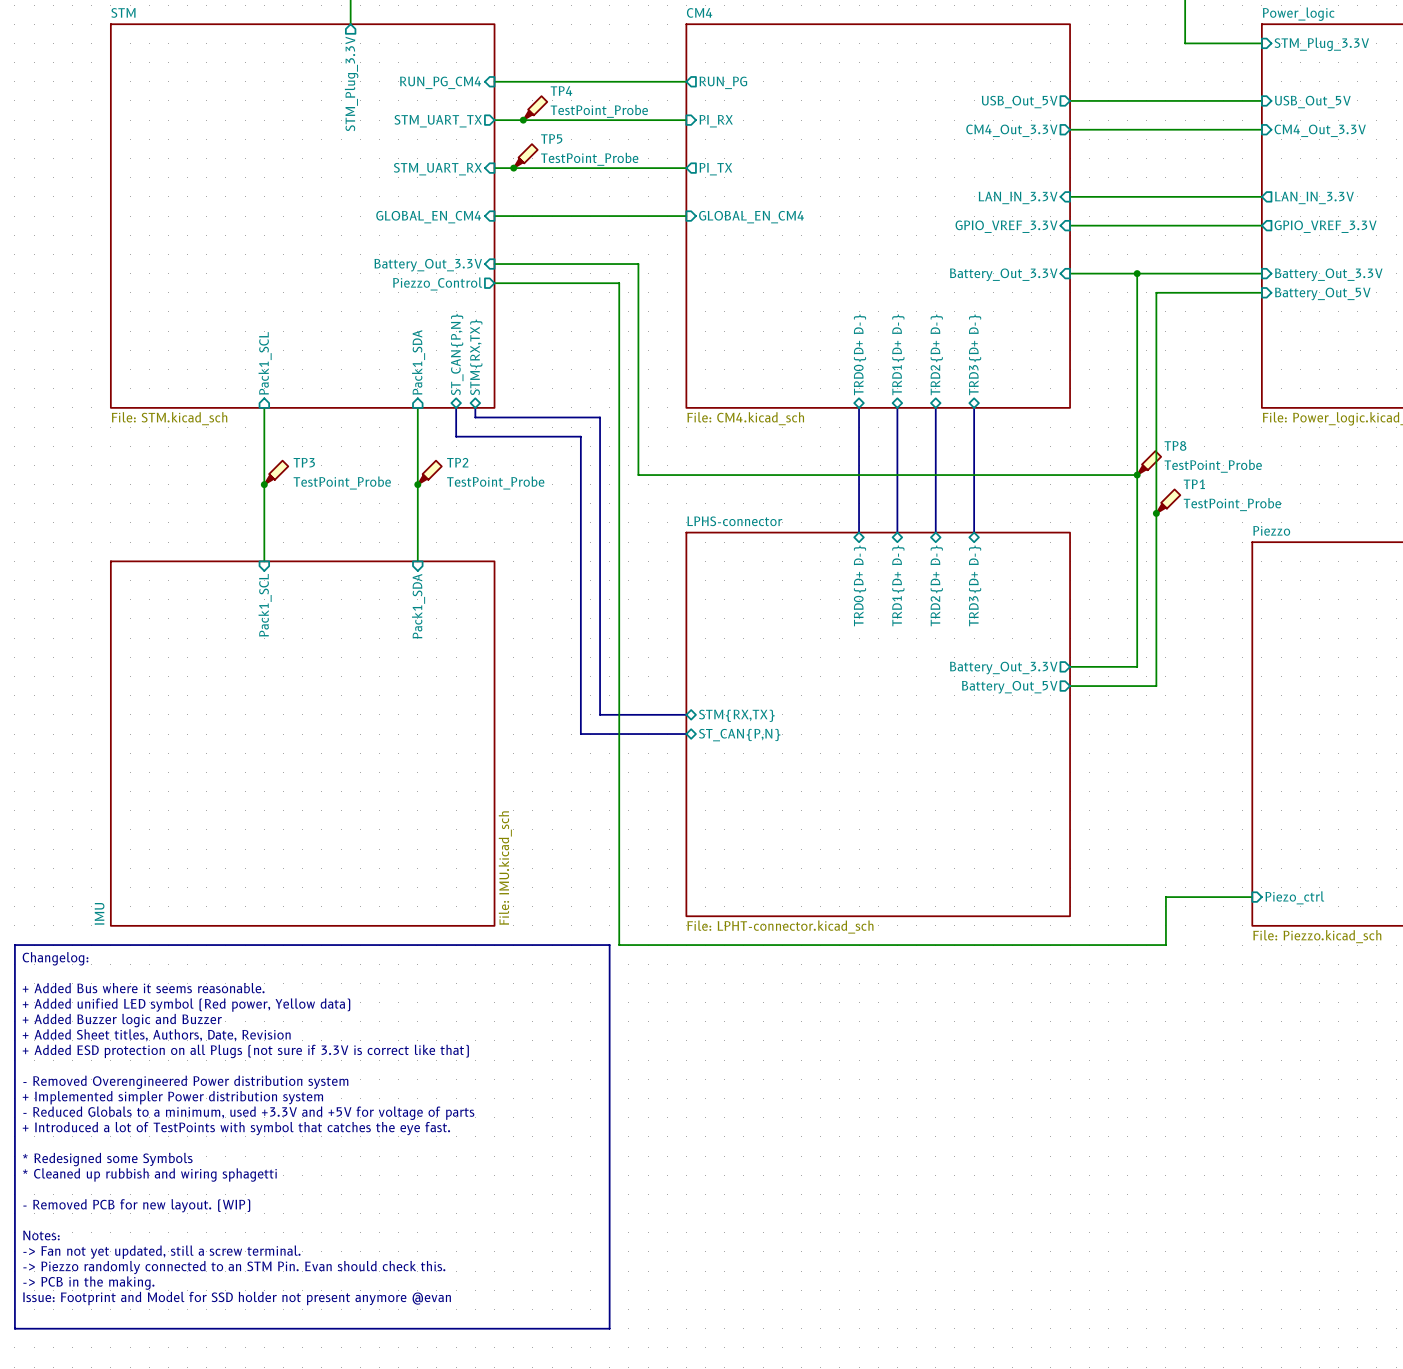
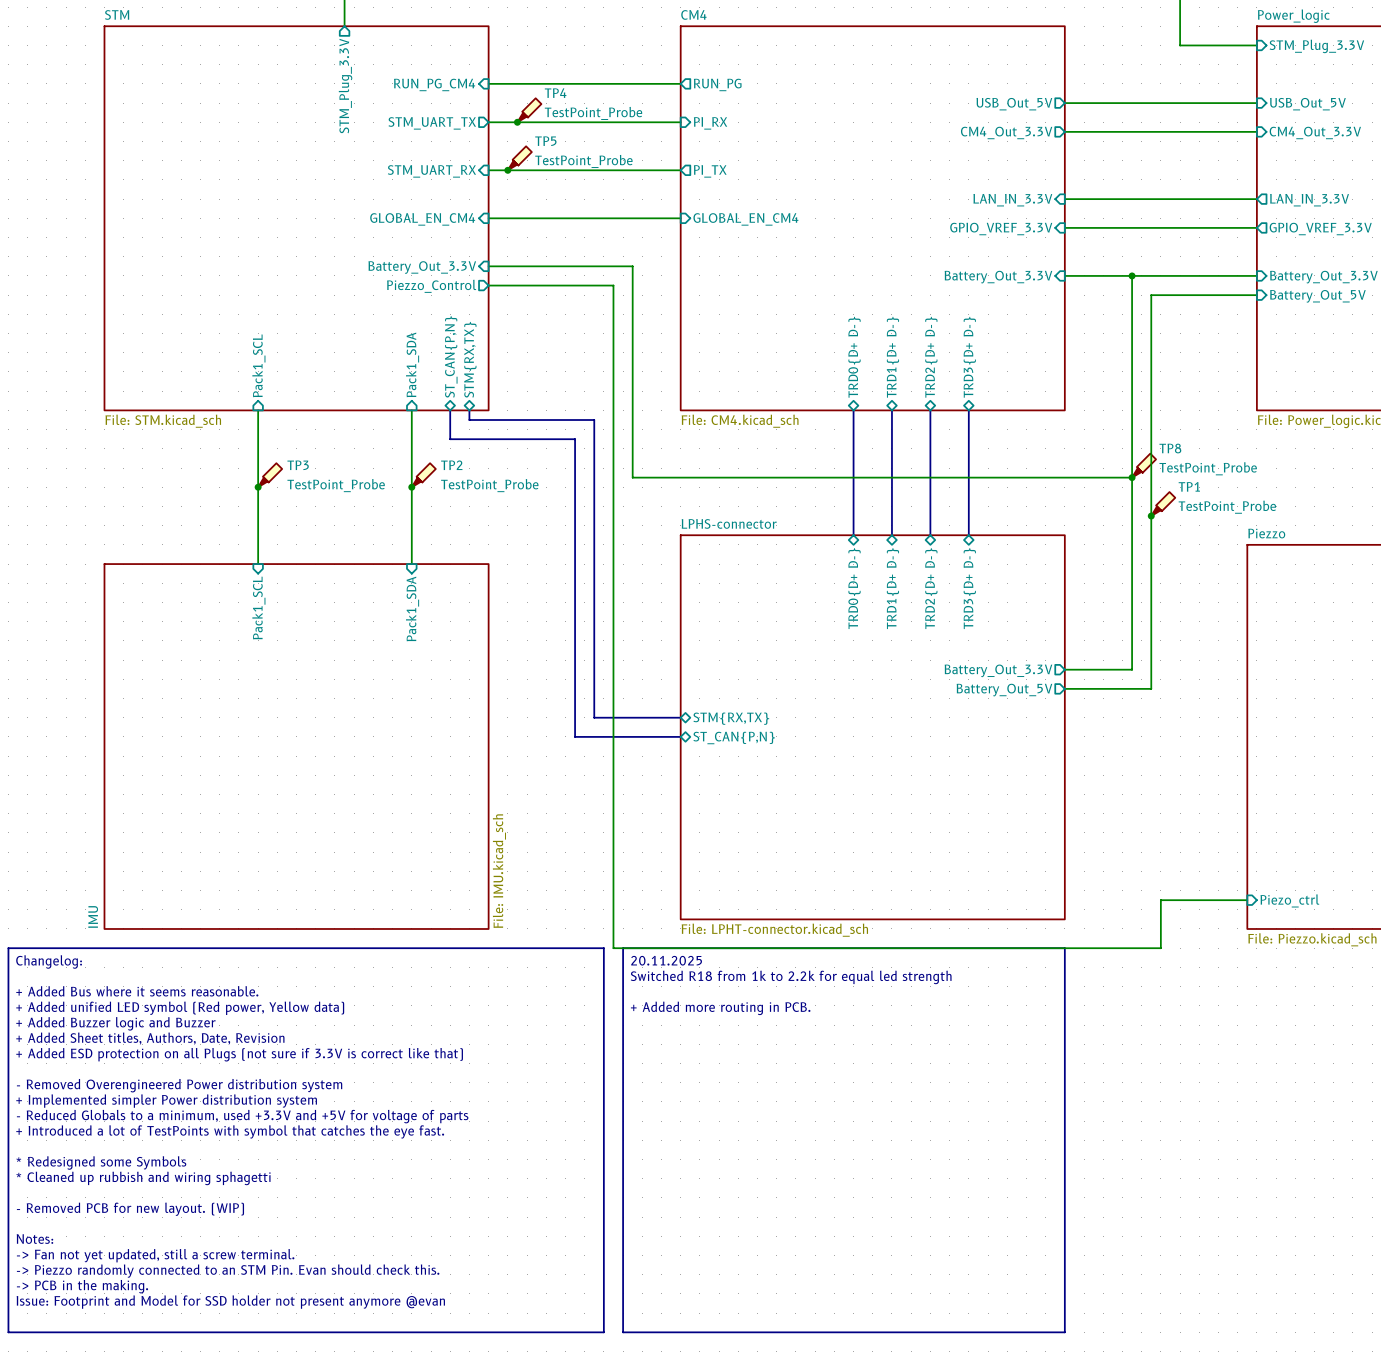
line: none -> (623, 948) (1064, 948) (1064, 1332) (623, 1332) (623, 948)
text: none -> 20.11.2025 (666, 960)
text: none -> Switched R18 from 1k to 2.2k for equal led strength (791, 977)
text: none -> + Added more routing in PCB. (720, 1008)

